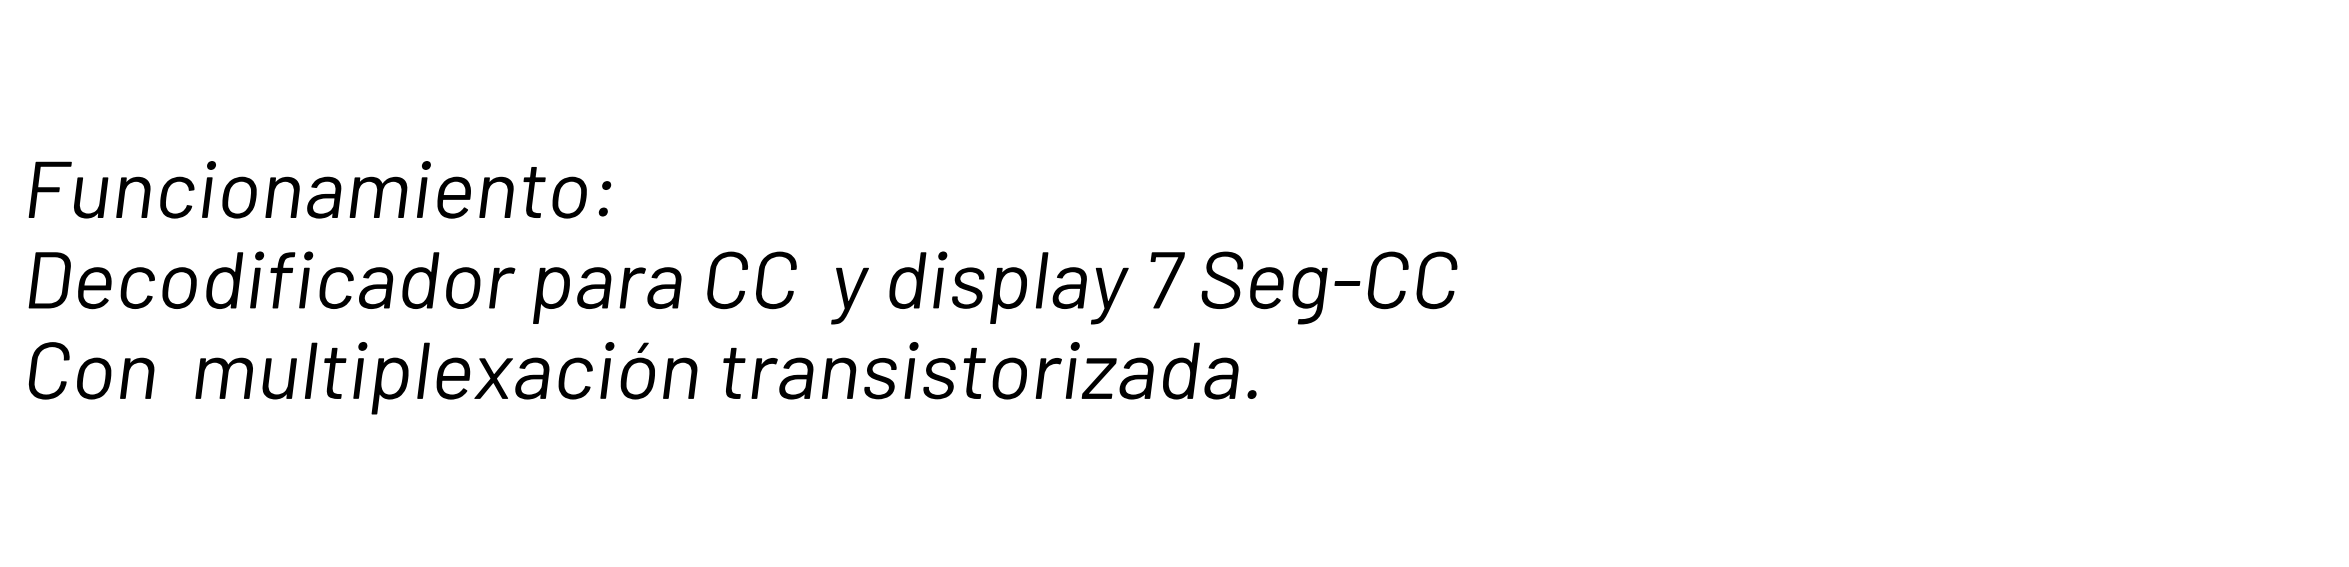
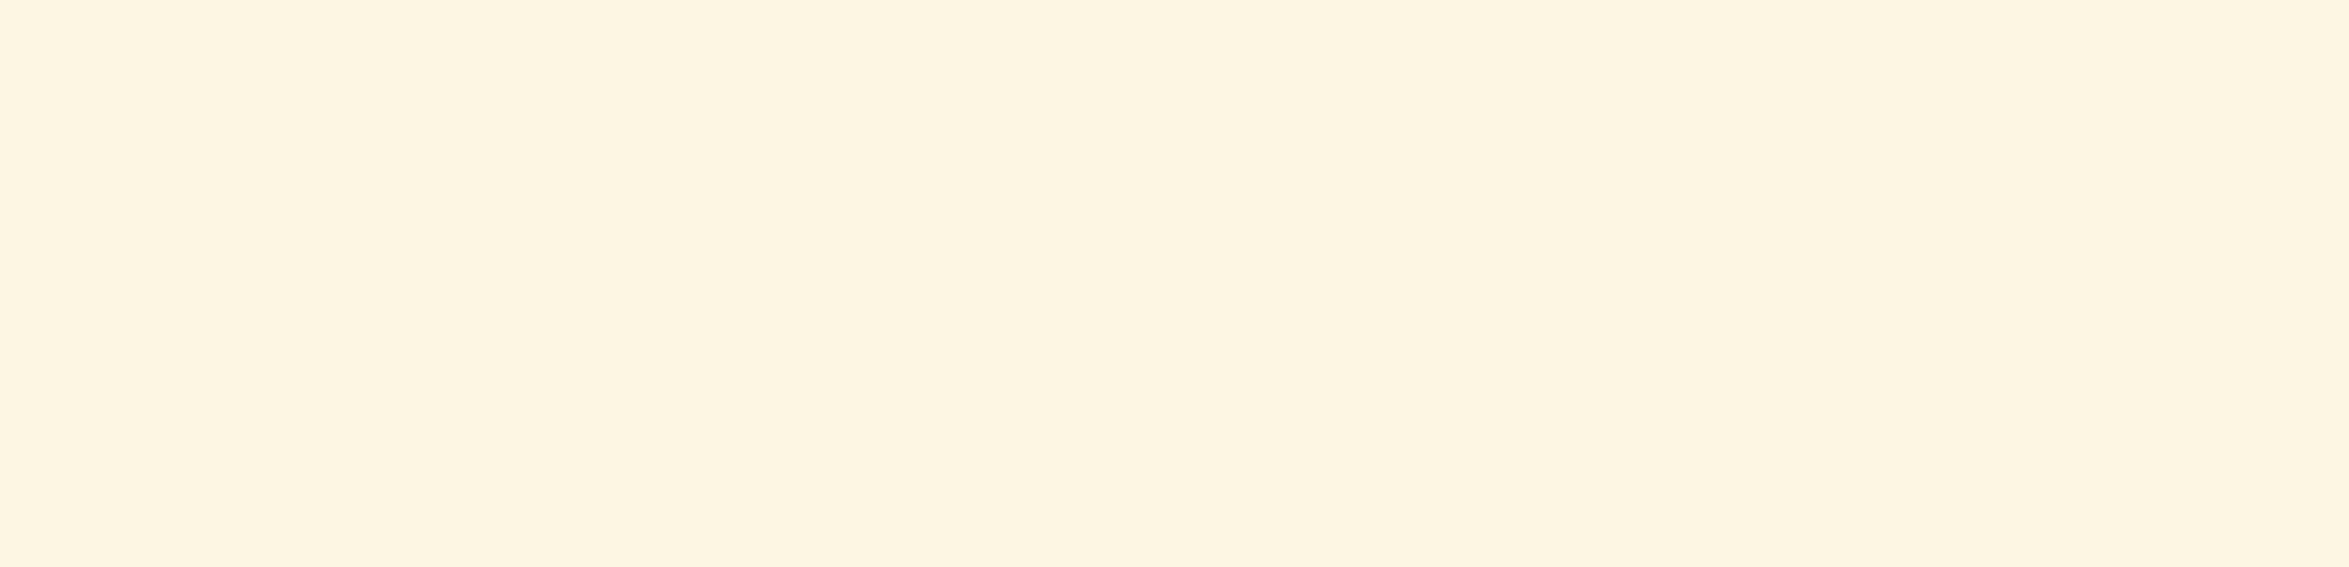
text: Funcionamiento: (320, 189) -> none
text: Decodificador para CC y display 7 Seg-CC (743, 287) -> none
text: Con multiplexación transistorizada. (642, 378) -> none

